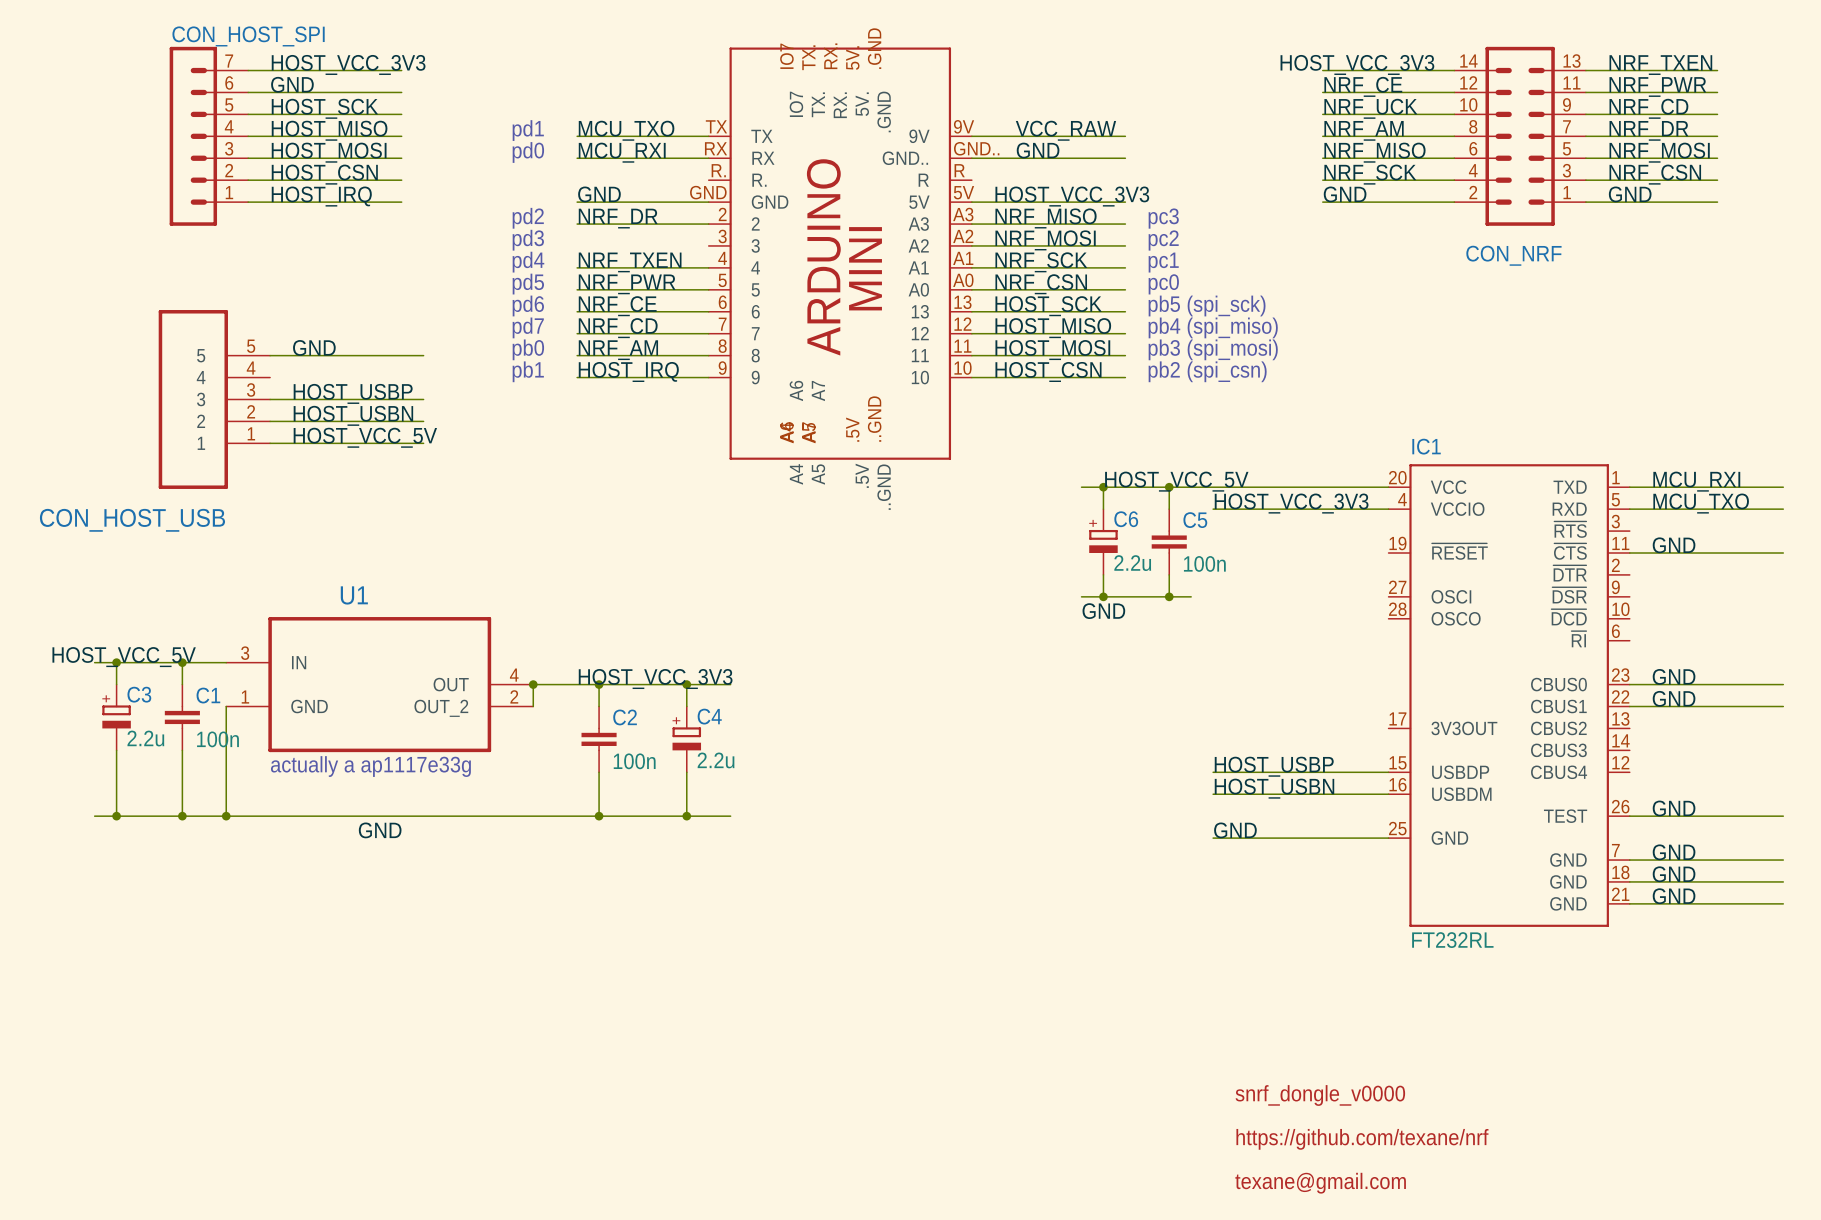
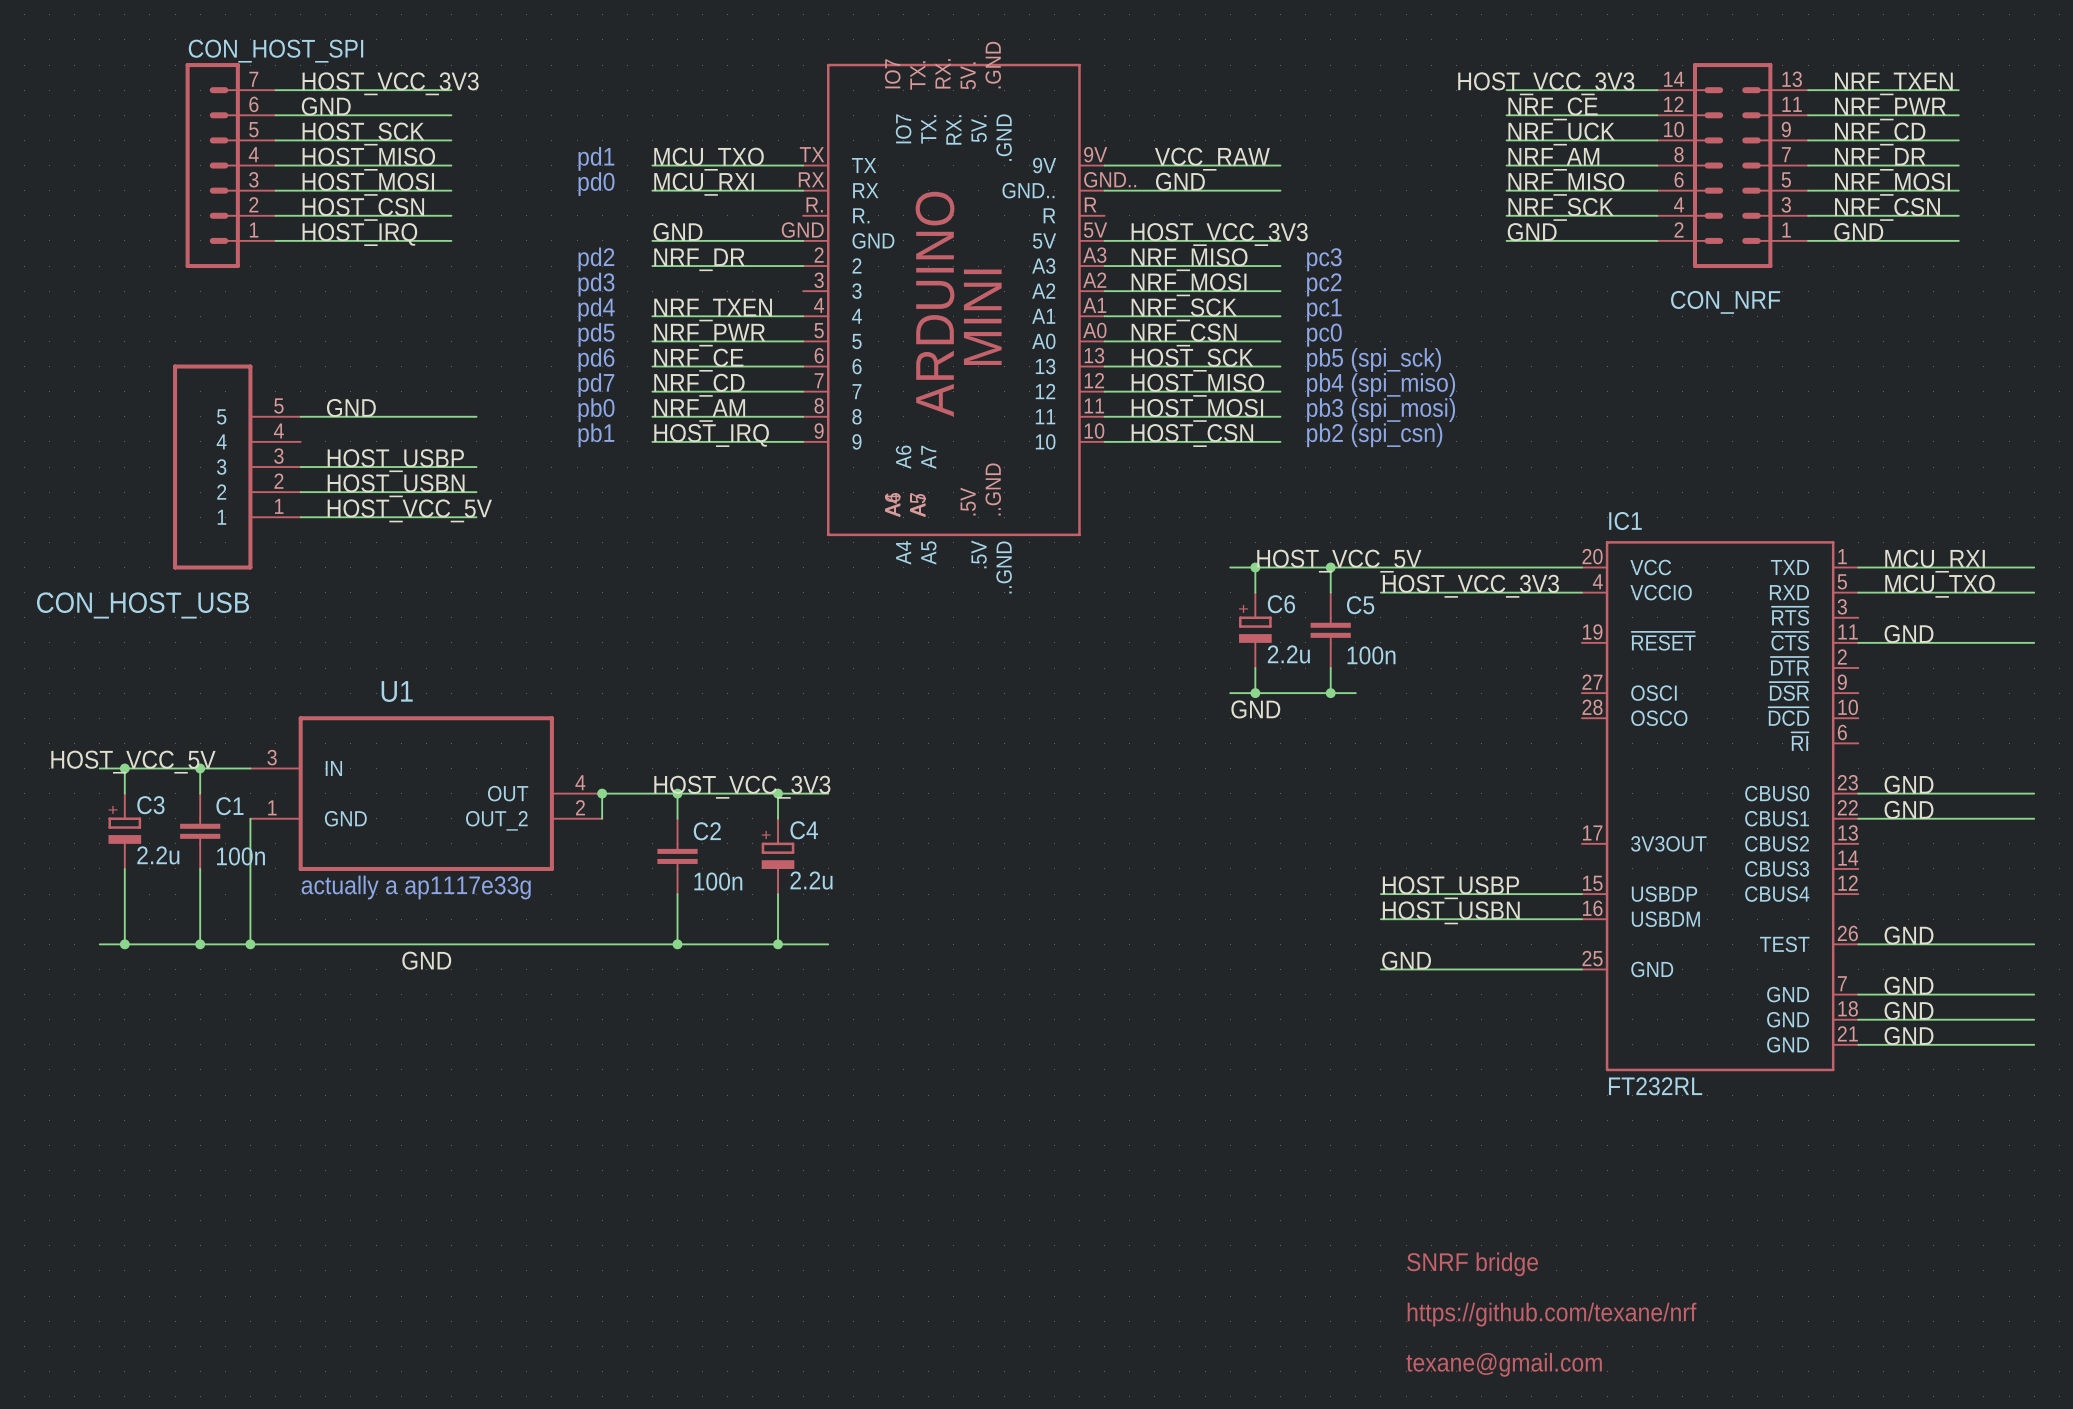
text: snrf_dongle_v0000 (1320, 1095) -> SNRF bridge (1472, 1264)

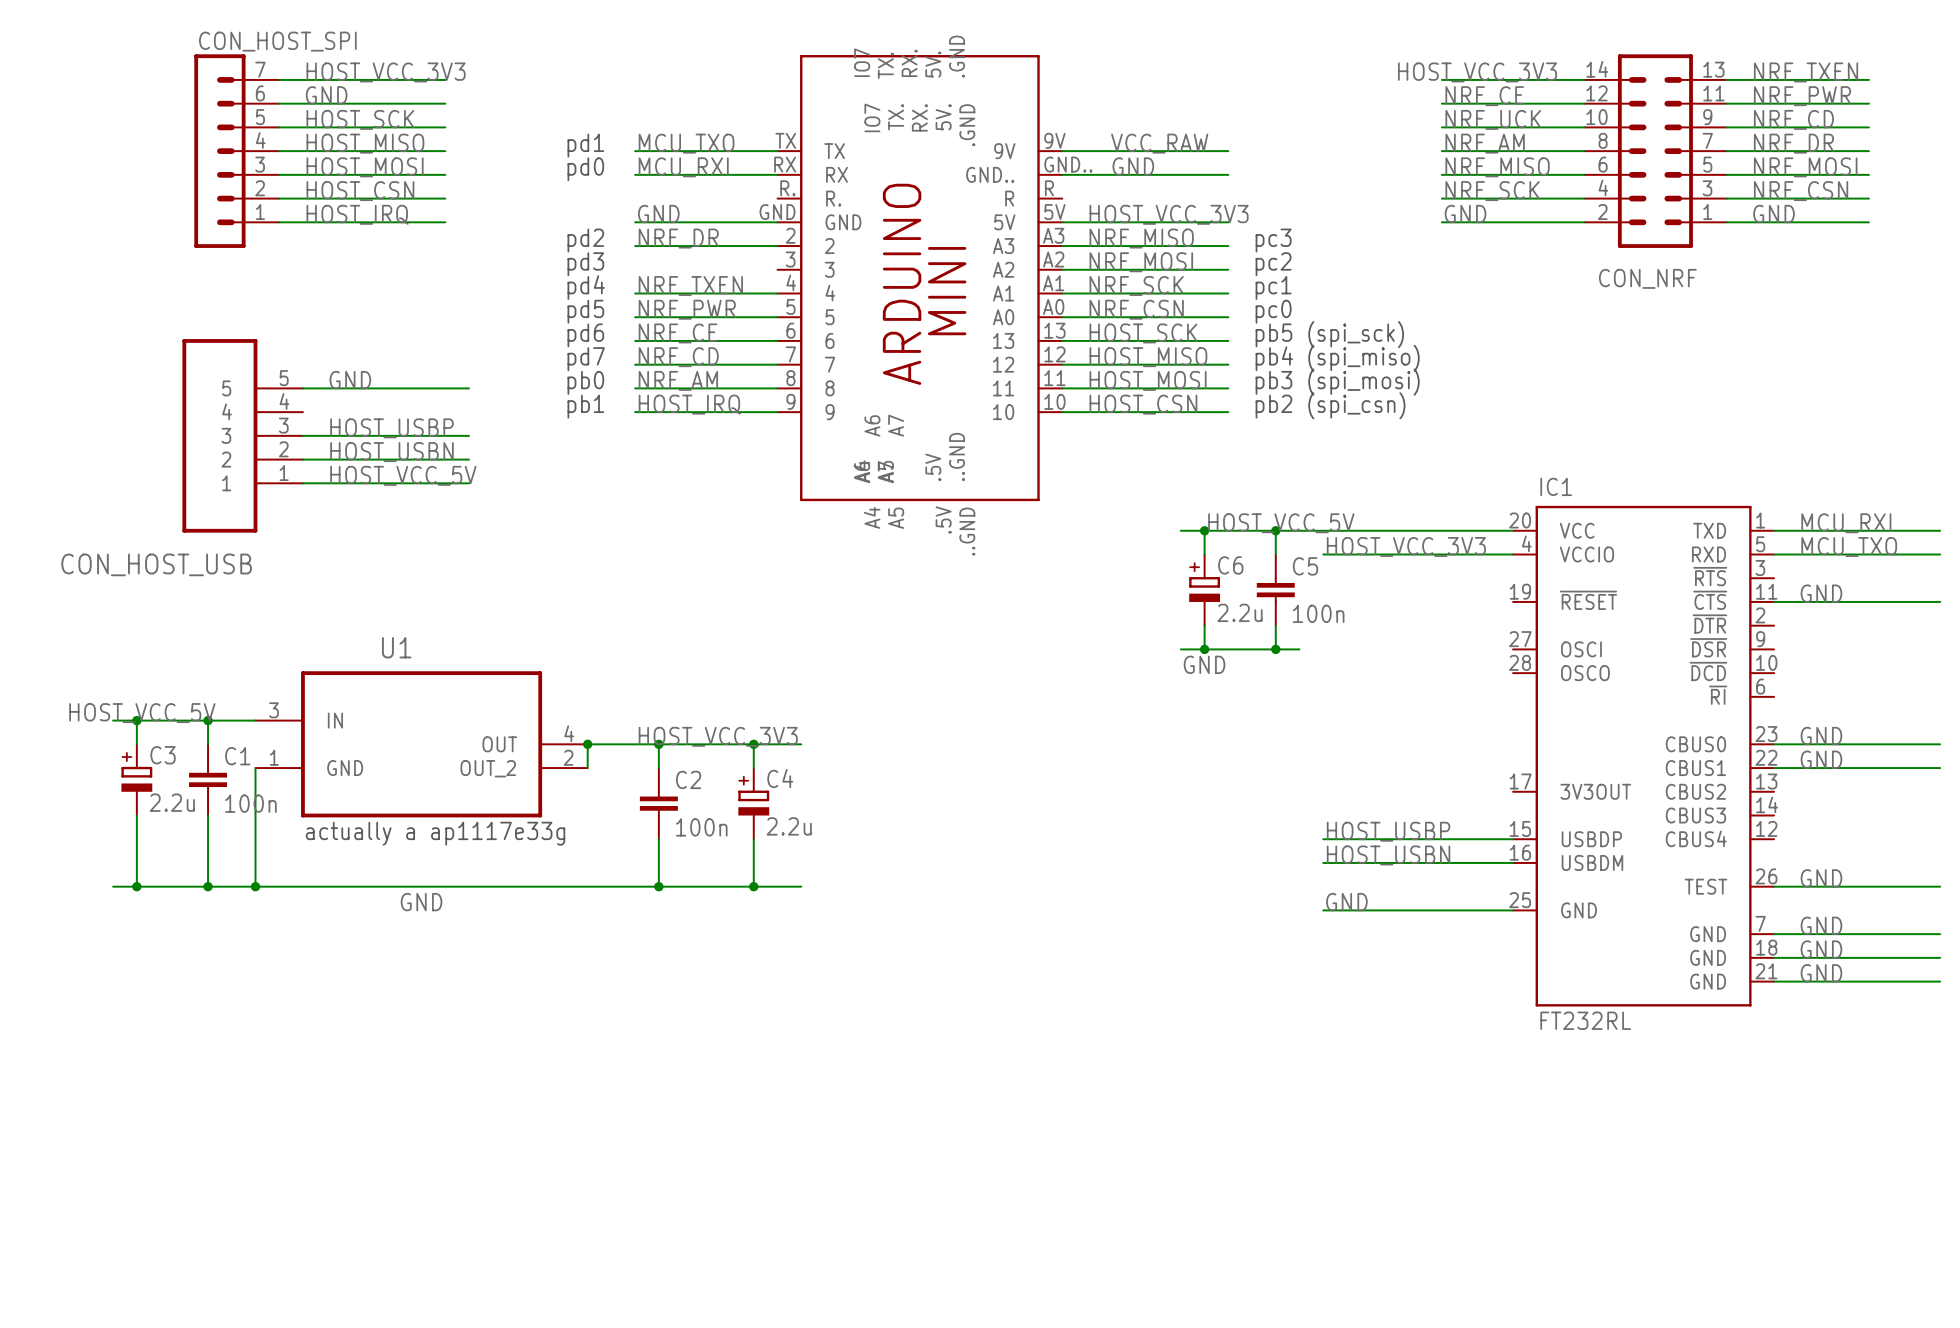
text: SNRF bridge (1472, 1264) -> none
text: https://github.com/texane/nrf (1552, 1314) -> none
text: texane@gmail.com (1504, 1364) -> none

